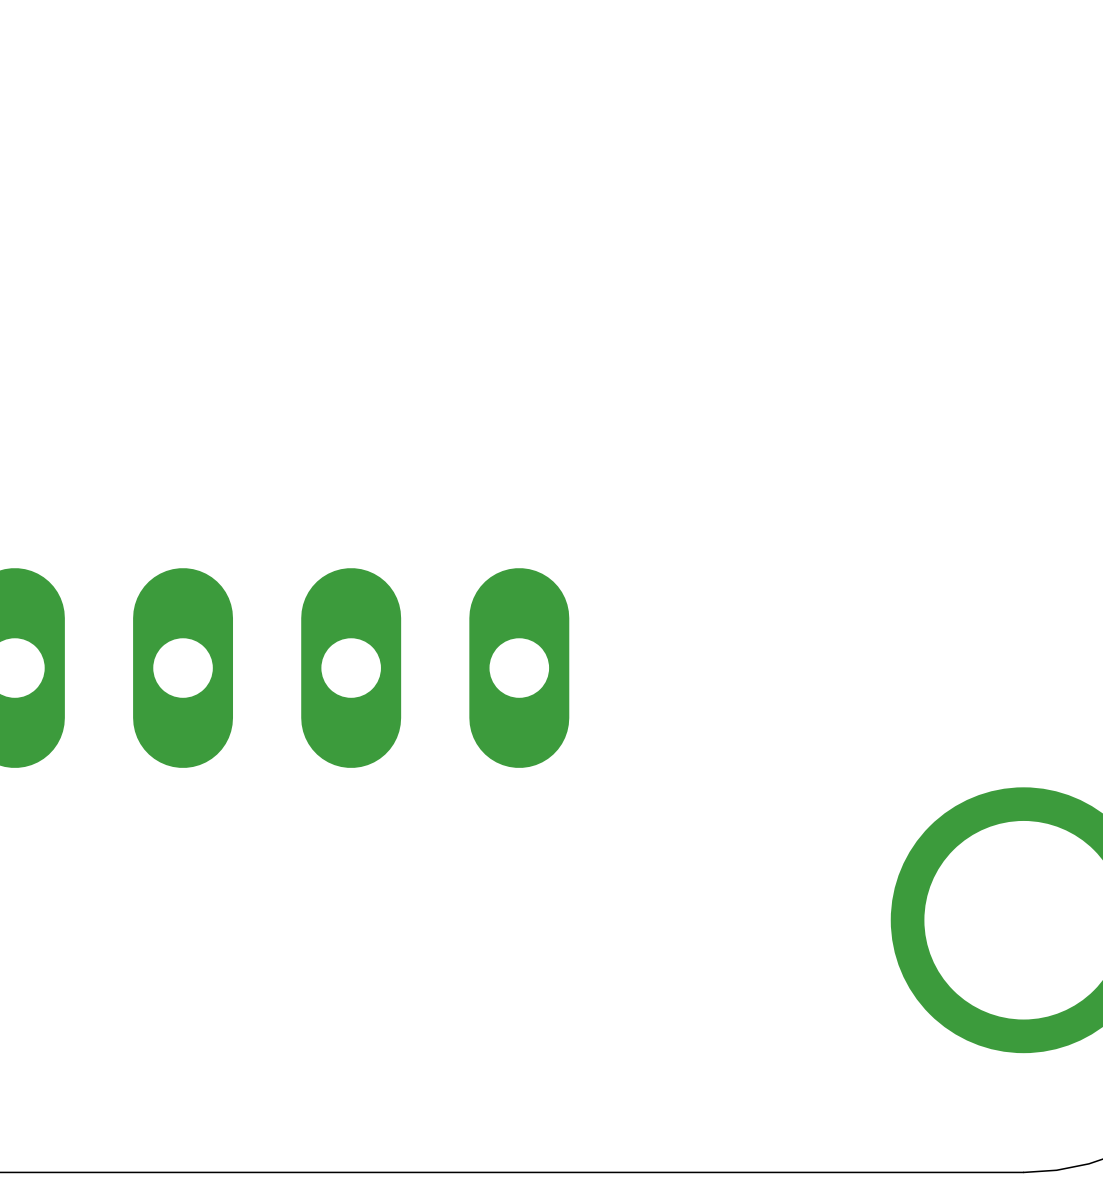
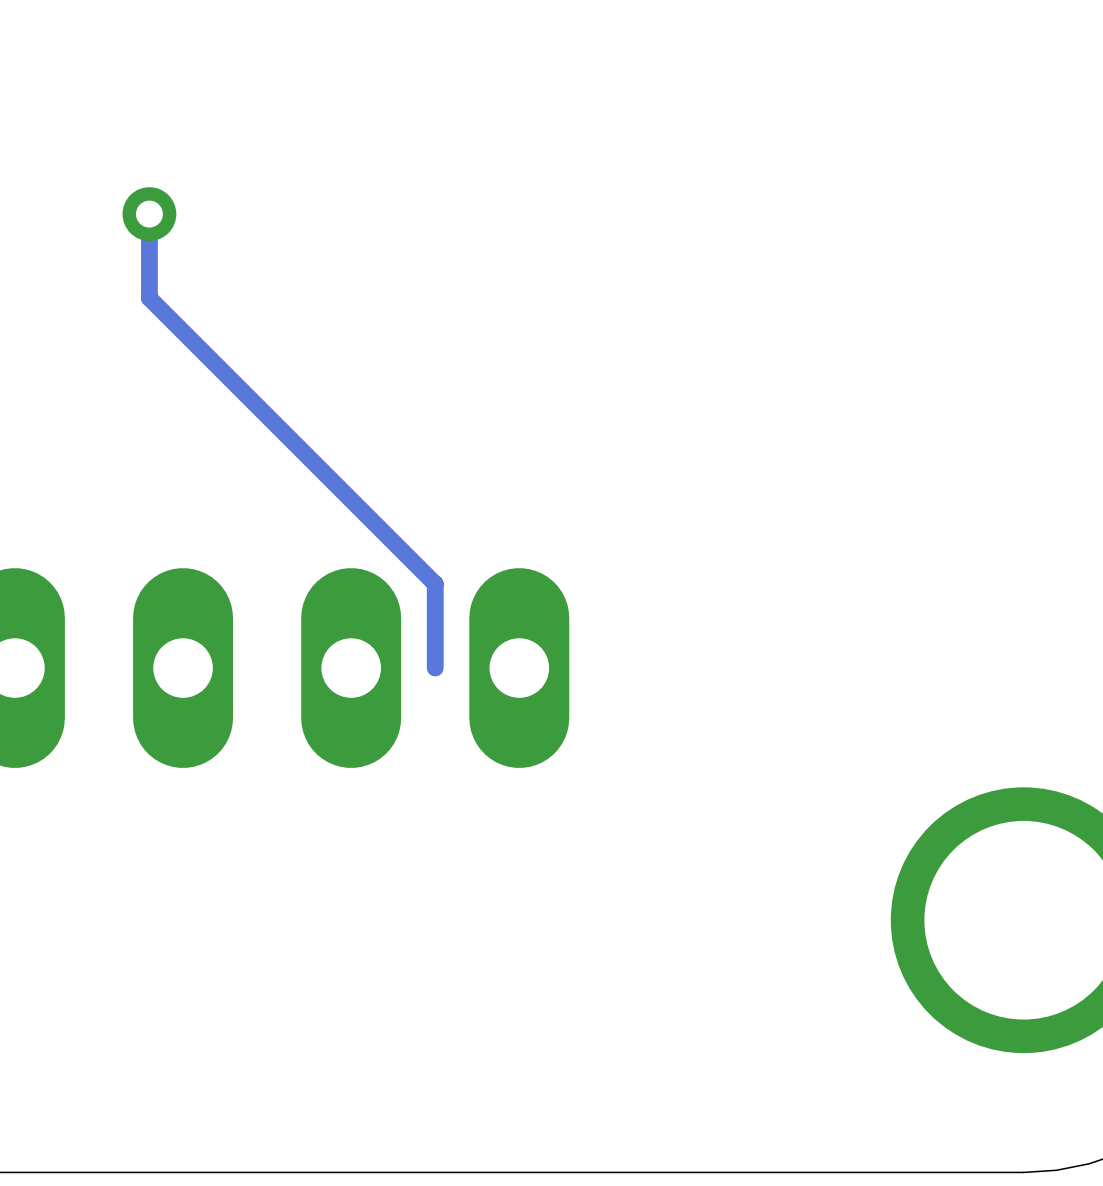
track: none -> (149, 214) (149, 298) (435, 583) (435, 668)
via: none -> (149, 214)

